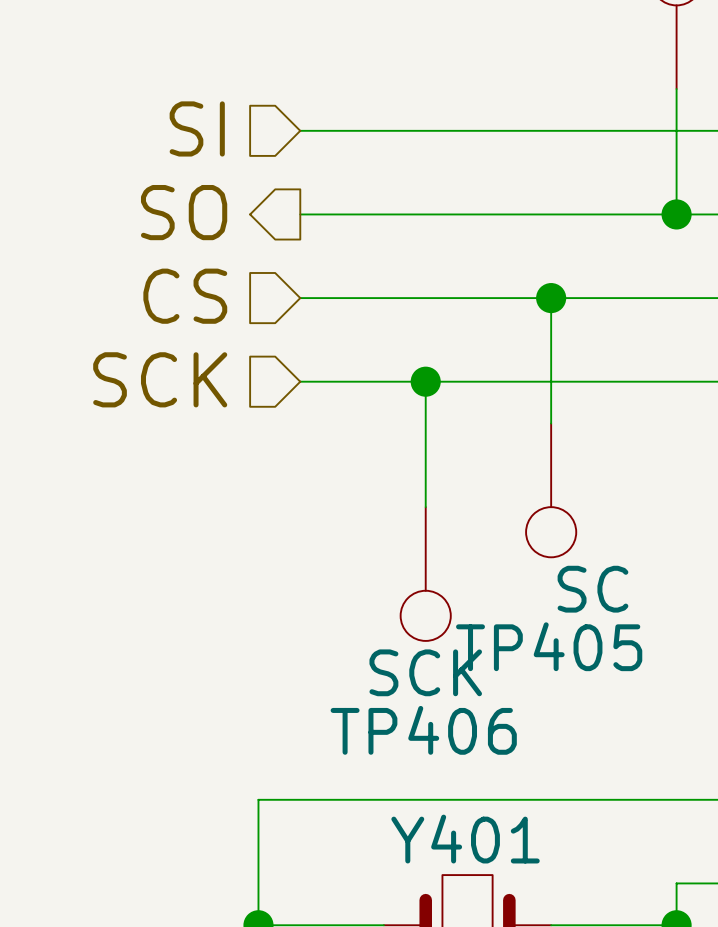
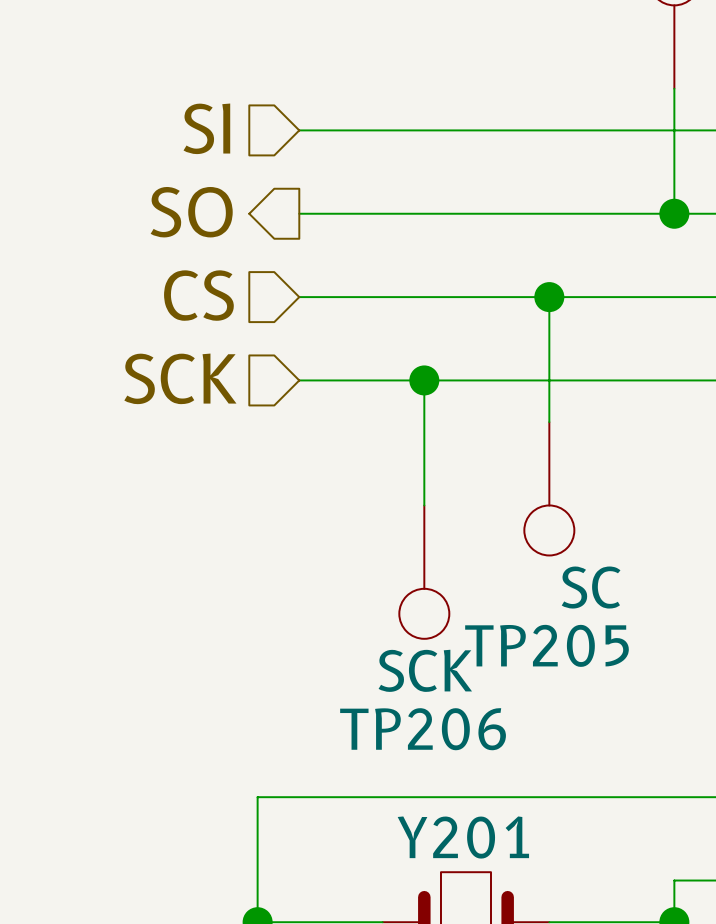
TP405 name: TP405 (549, 646) -> TP205 (546, 645)
TP406 name: TP406 (423, 730) -> TP206 (423, 729)
Y401 name: Y401 (465, 839) -> Y201 (463, 837)

